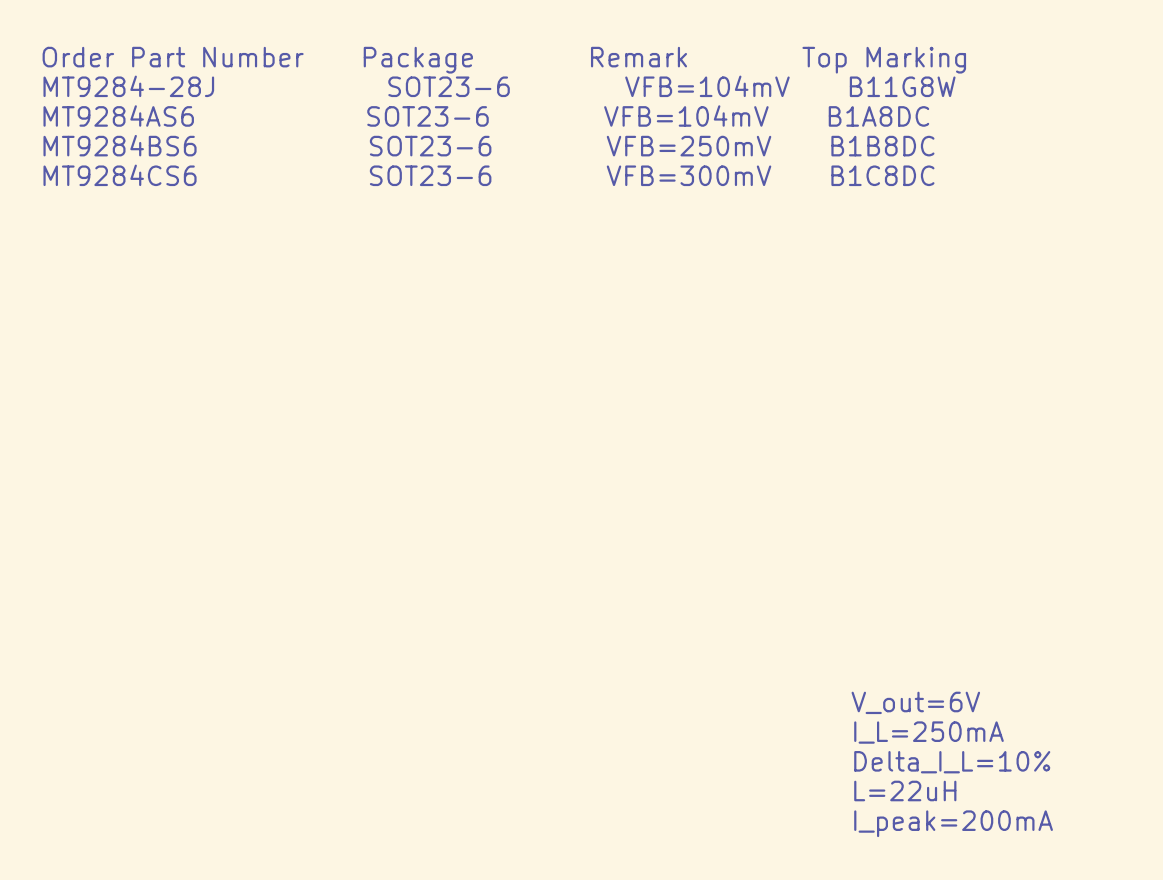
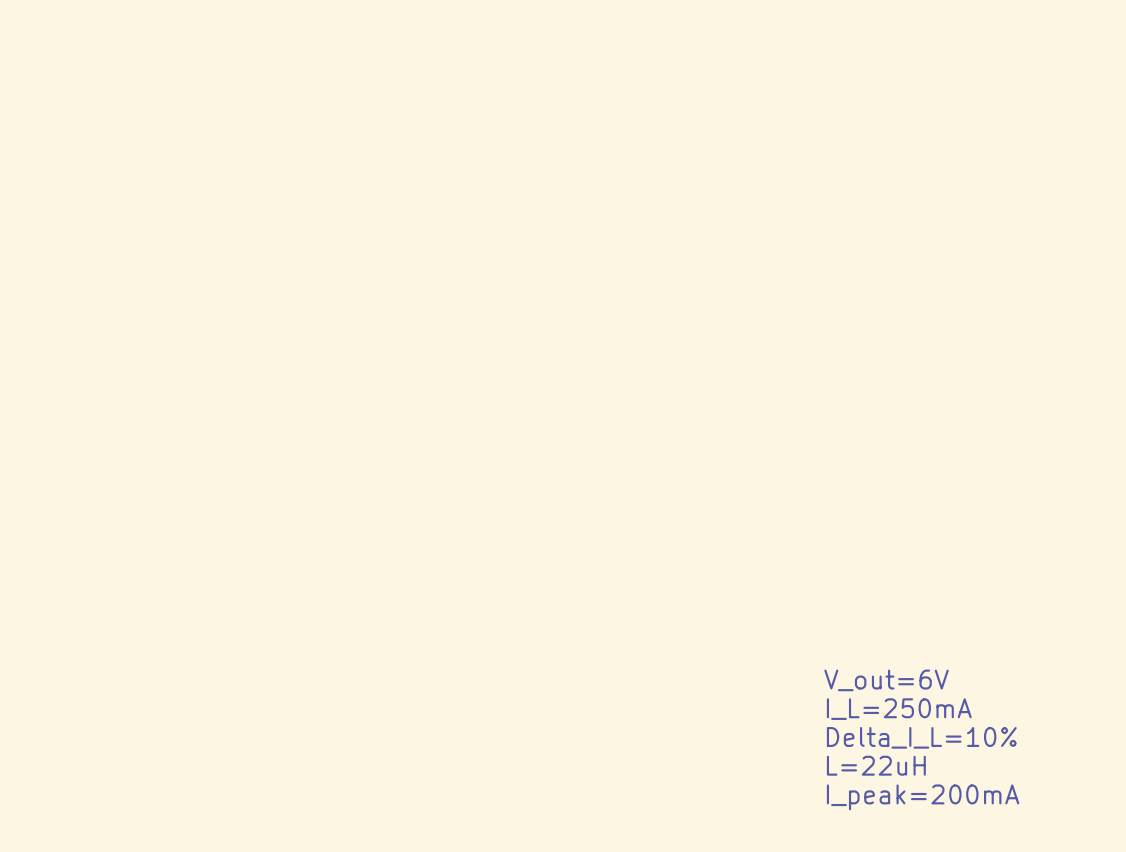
text: Order Part Number Package Remark Top Marking (504, 60) -> none
text: MT9284-28J SOT23-6 VFB=104mV B11G8W (499, 86) -> none
text: MT9284AS6 SOT23-6 VFB=104mV B1A8DC (486, 116) -> none
text: MT9284BS6 SOT23-6 VFB=250mV B1B8DC (488, 145) -> none
text: MT9284CS6 SOT23-6 VFB=300mV B1C8DC (488, 175) -> none

